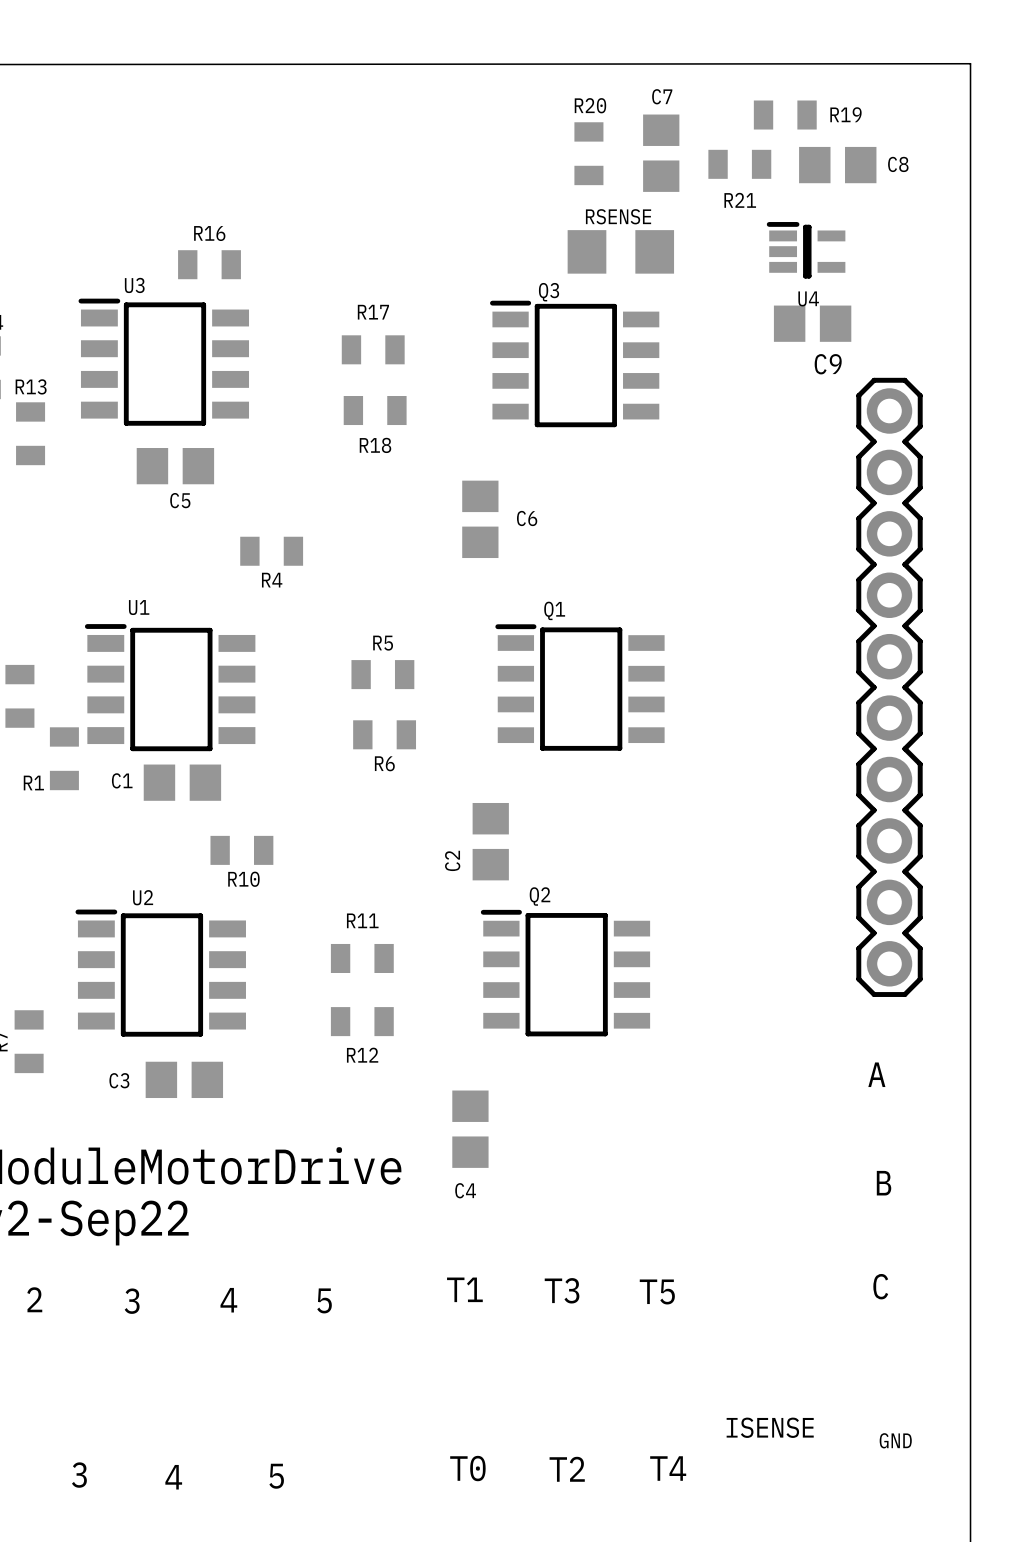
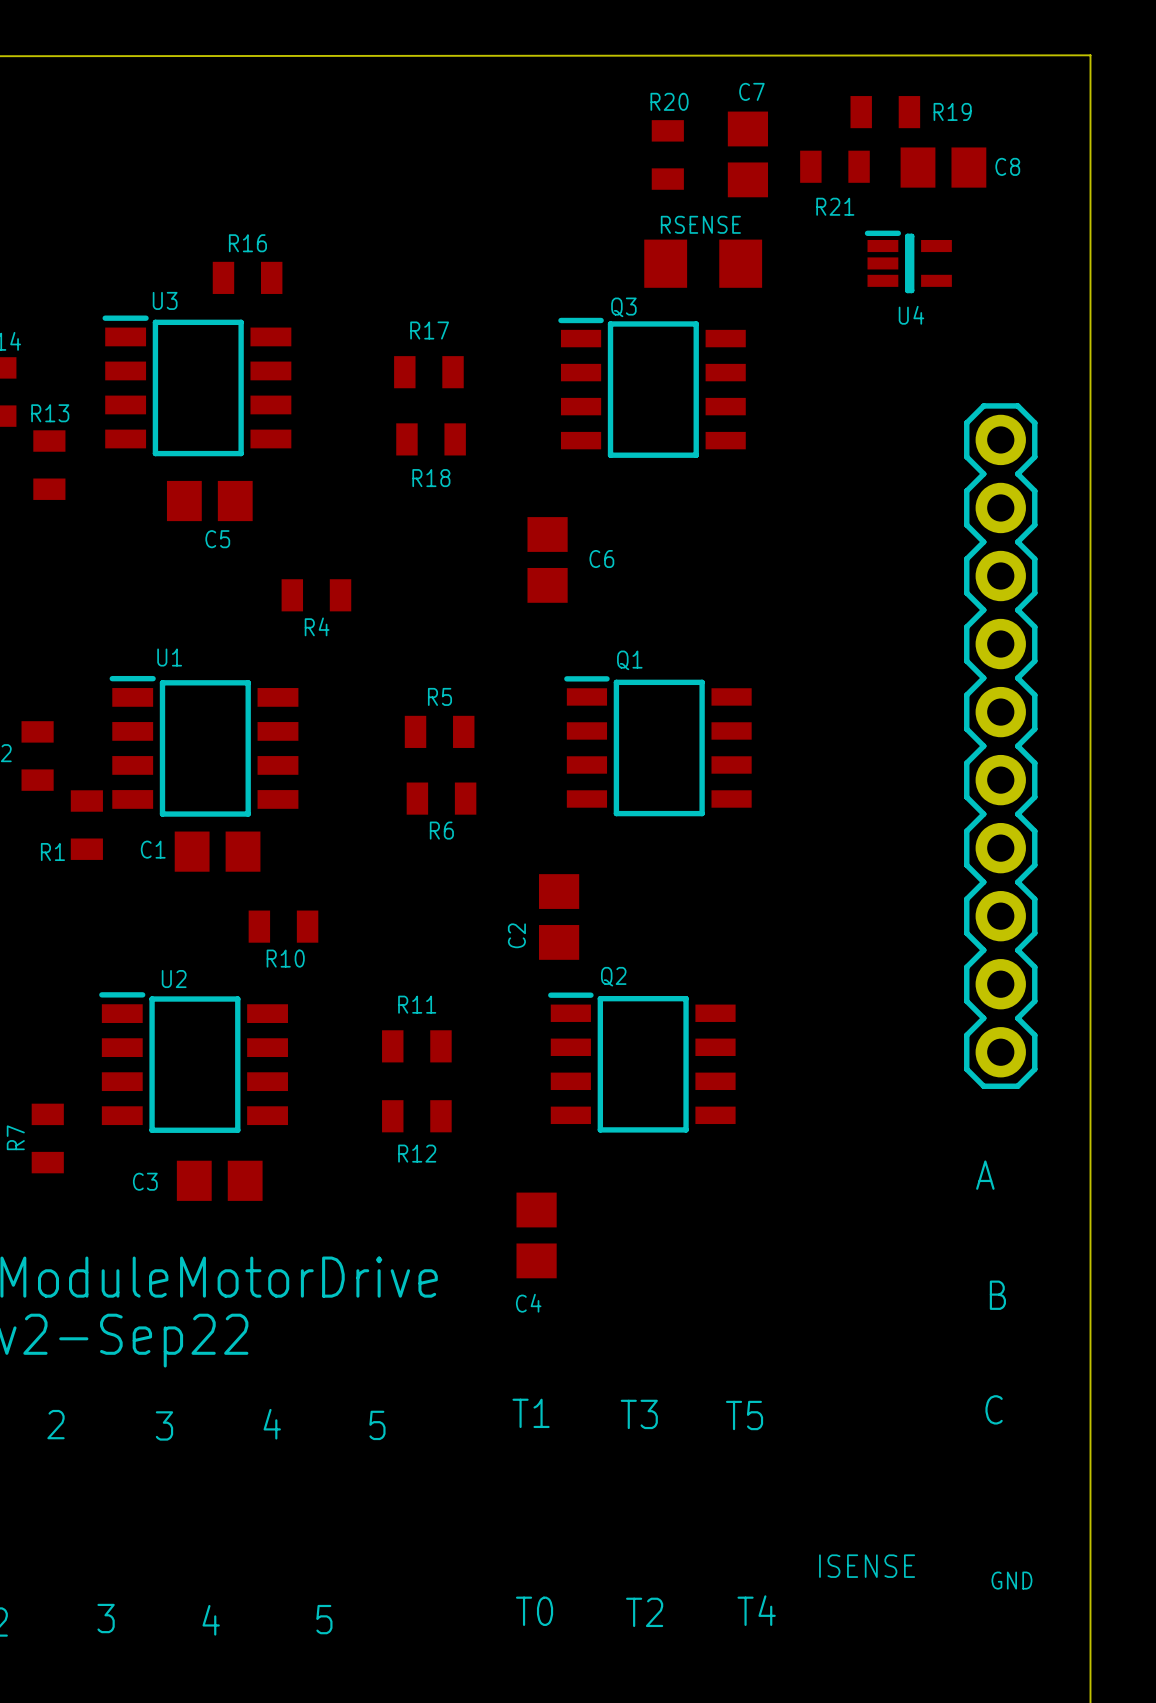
C9: (812, 323) -> none

